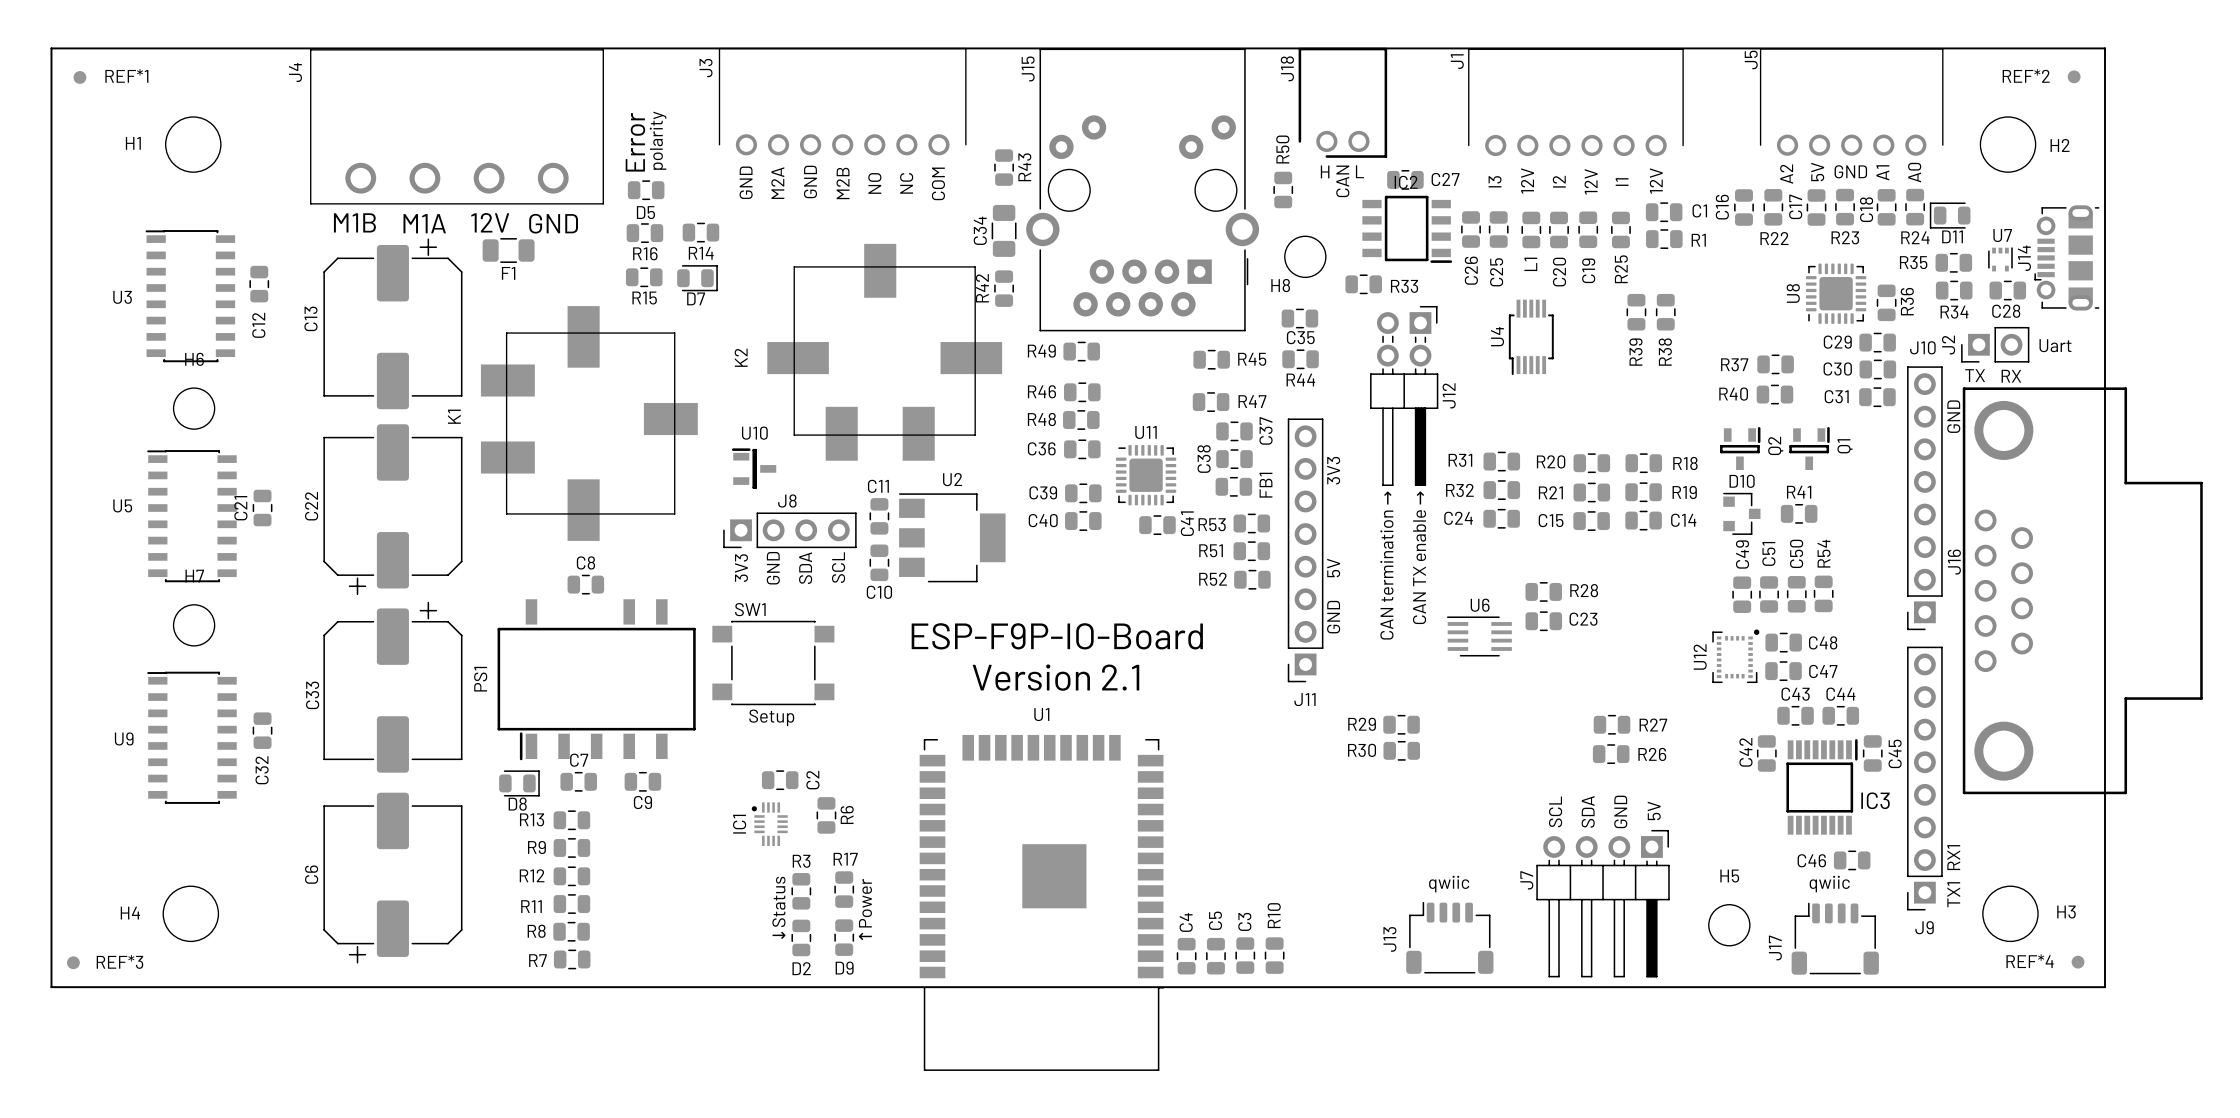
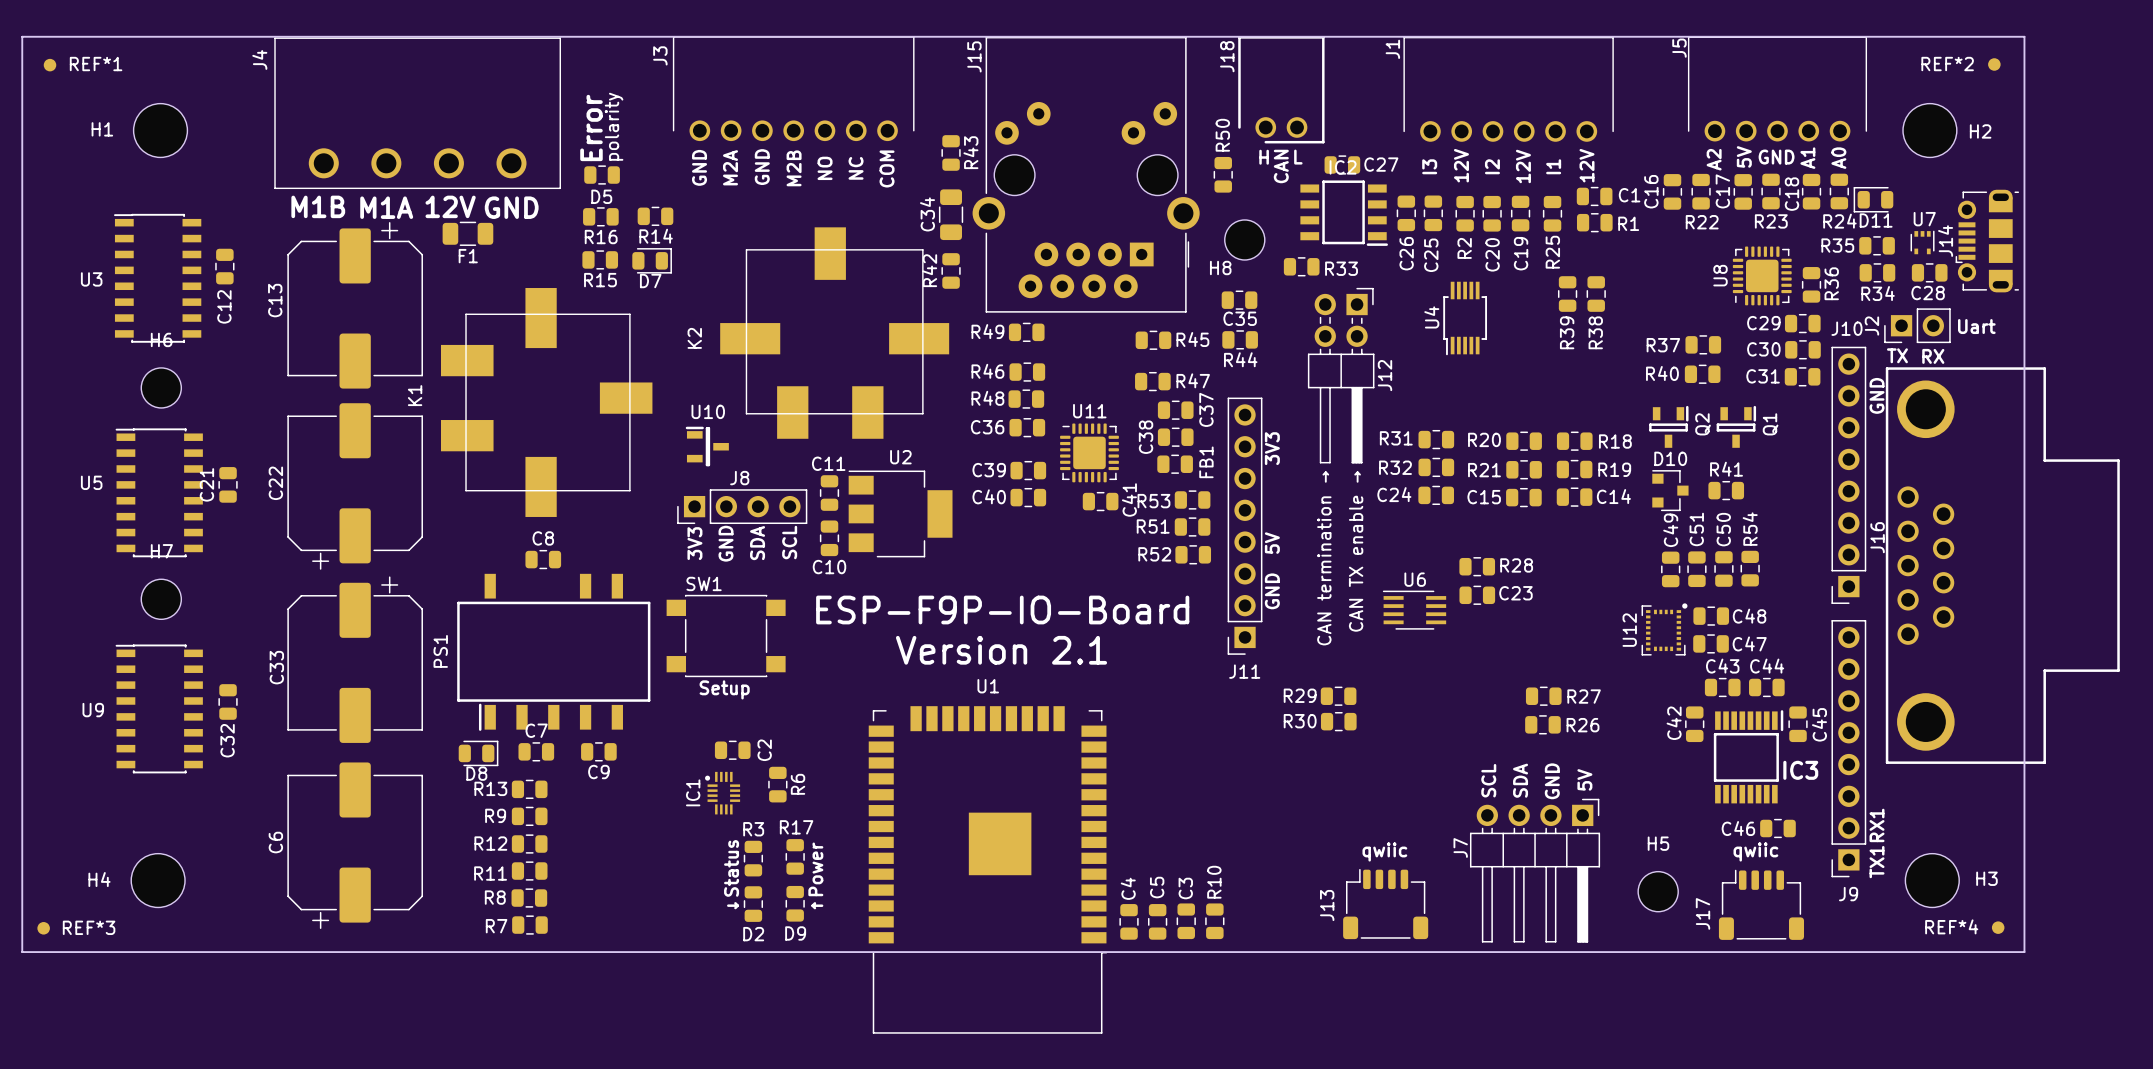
L1 name: L1 (1530, 264) -> R2 (1464, 248)

